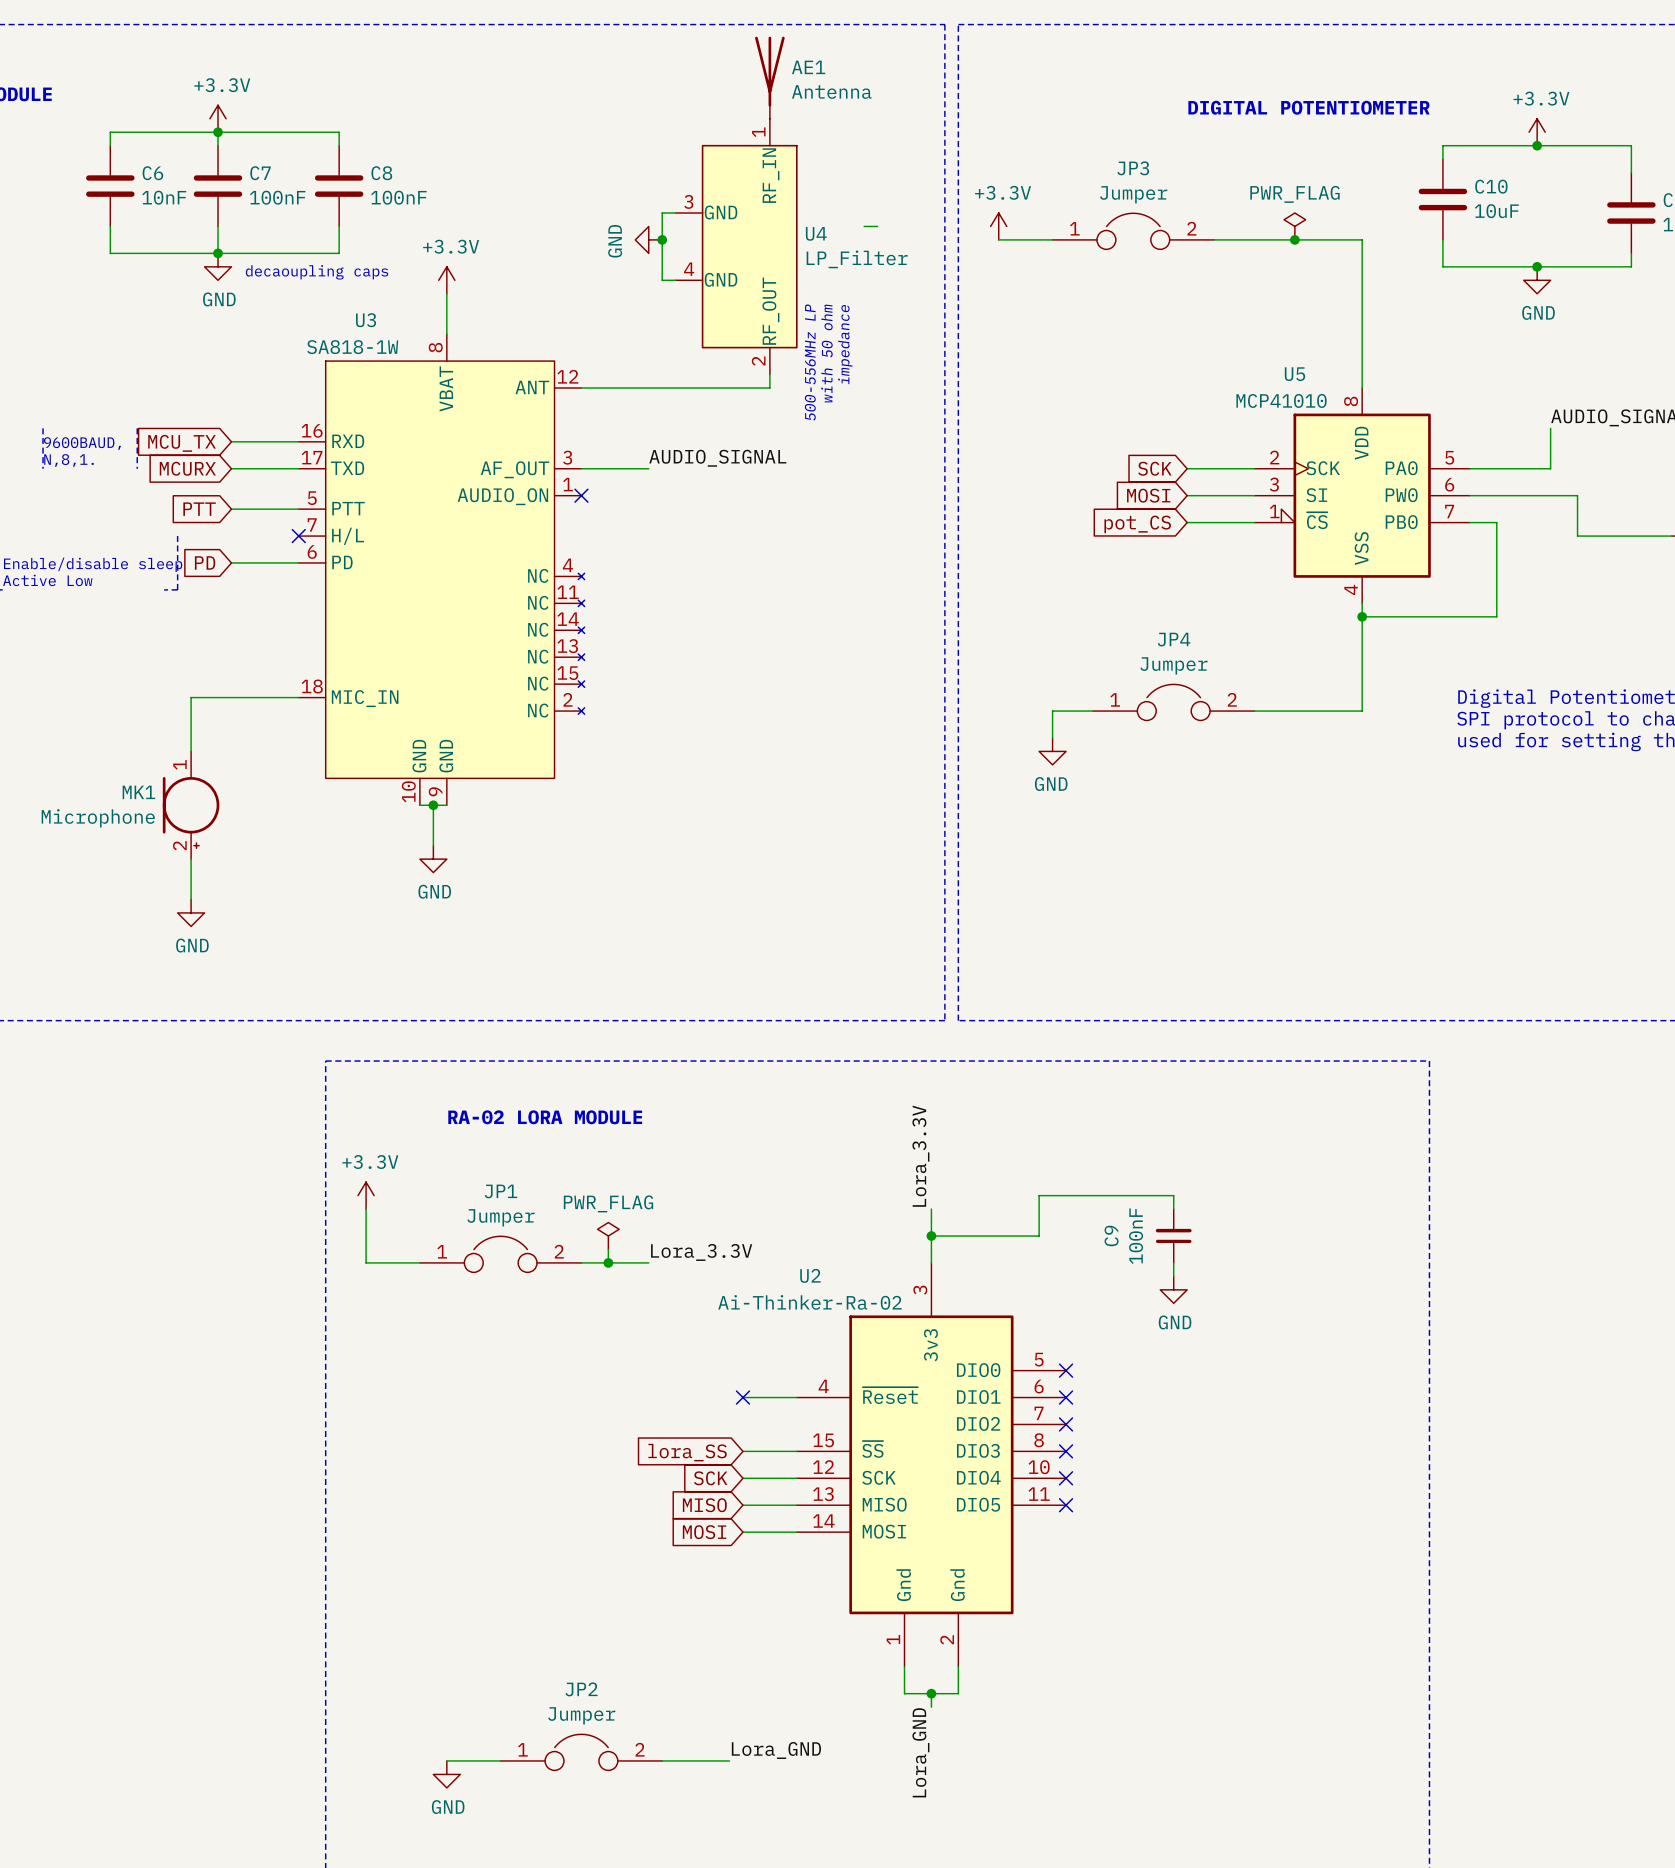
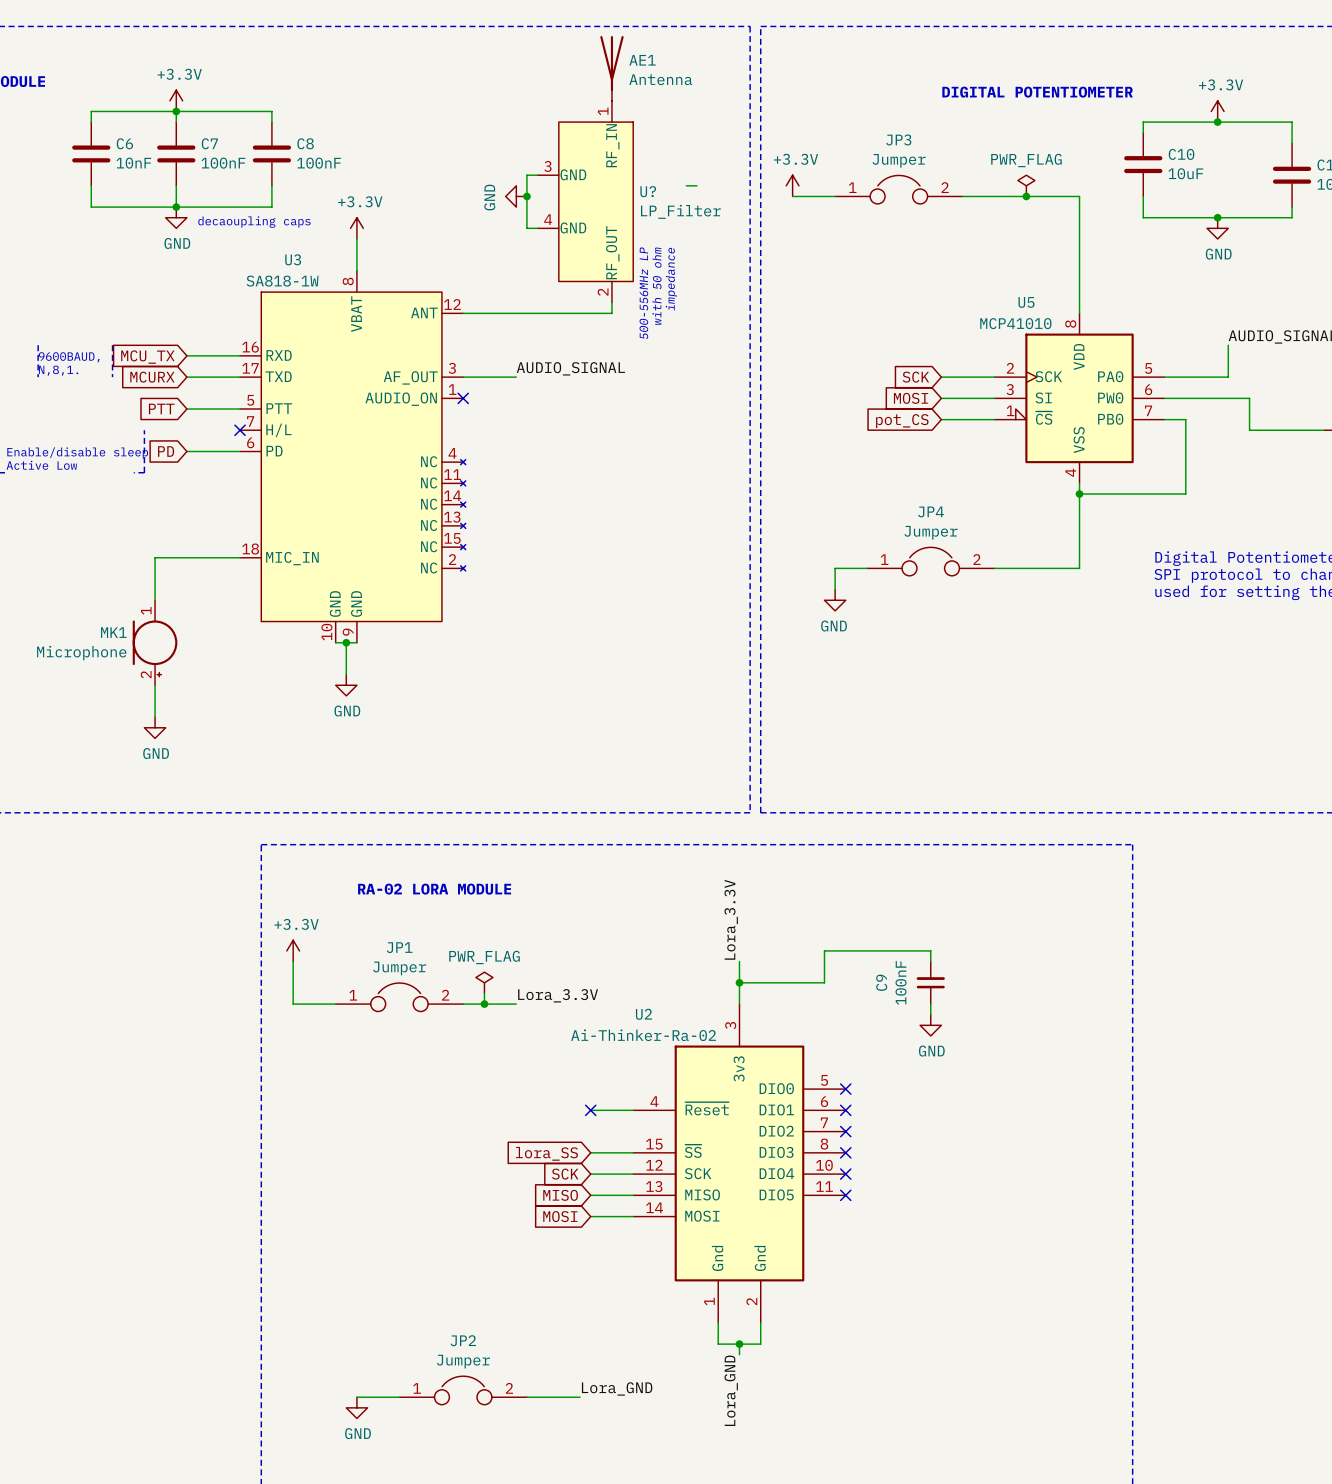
U4 name: U4 (816, 233) -> U? (648, 191)

